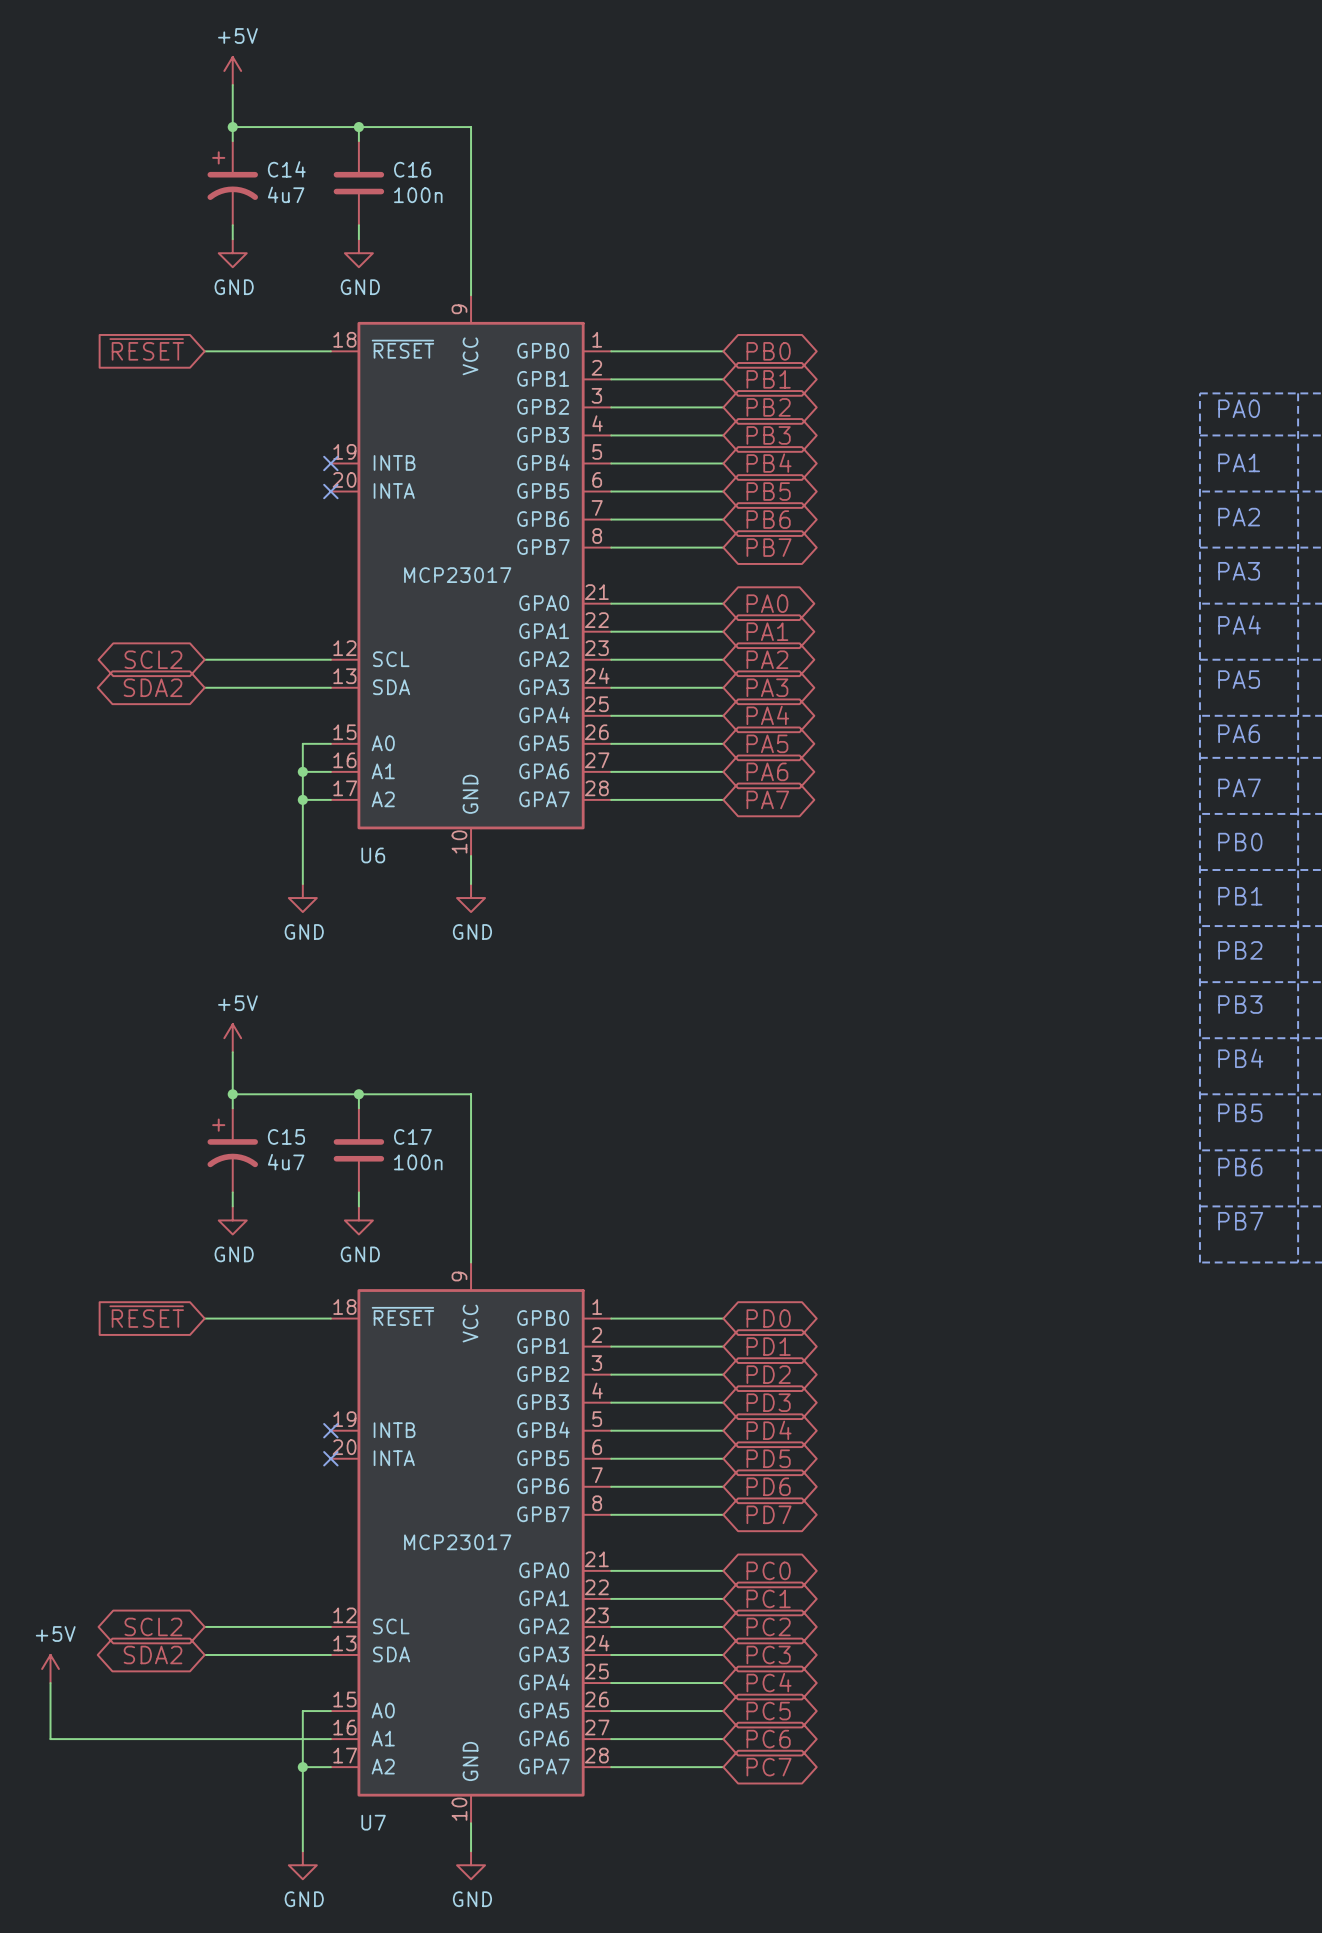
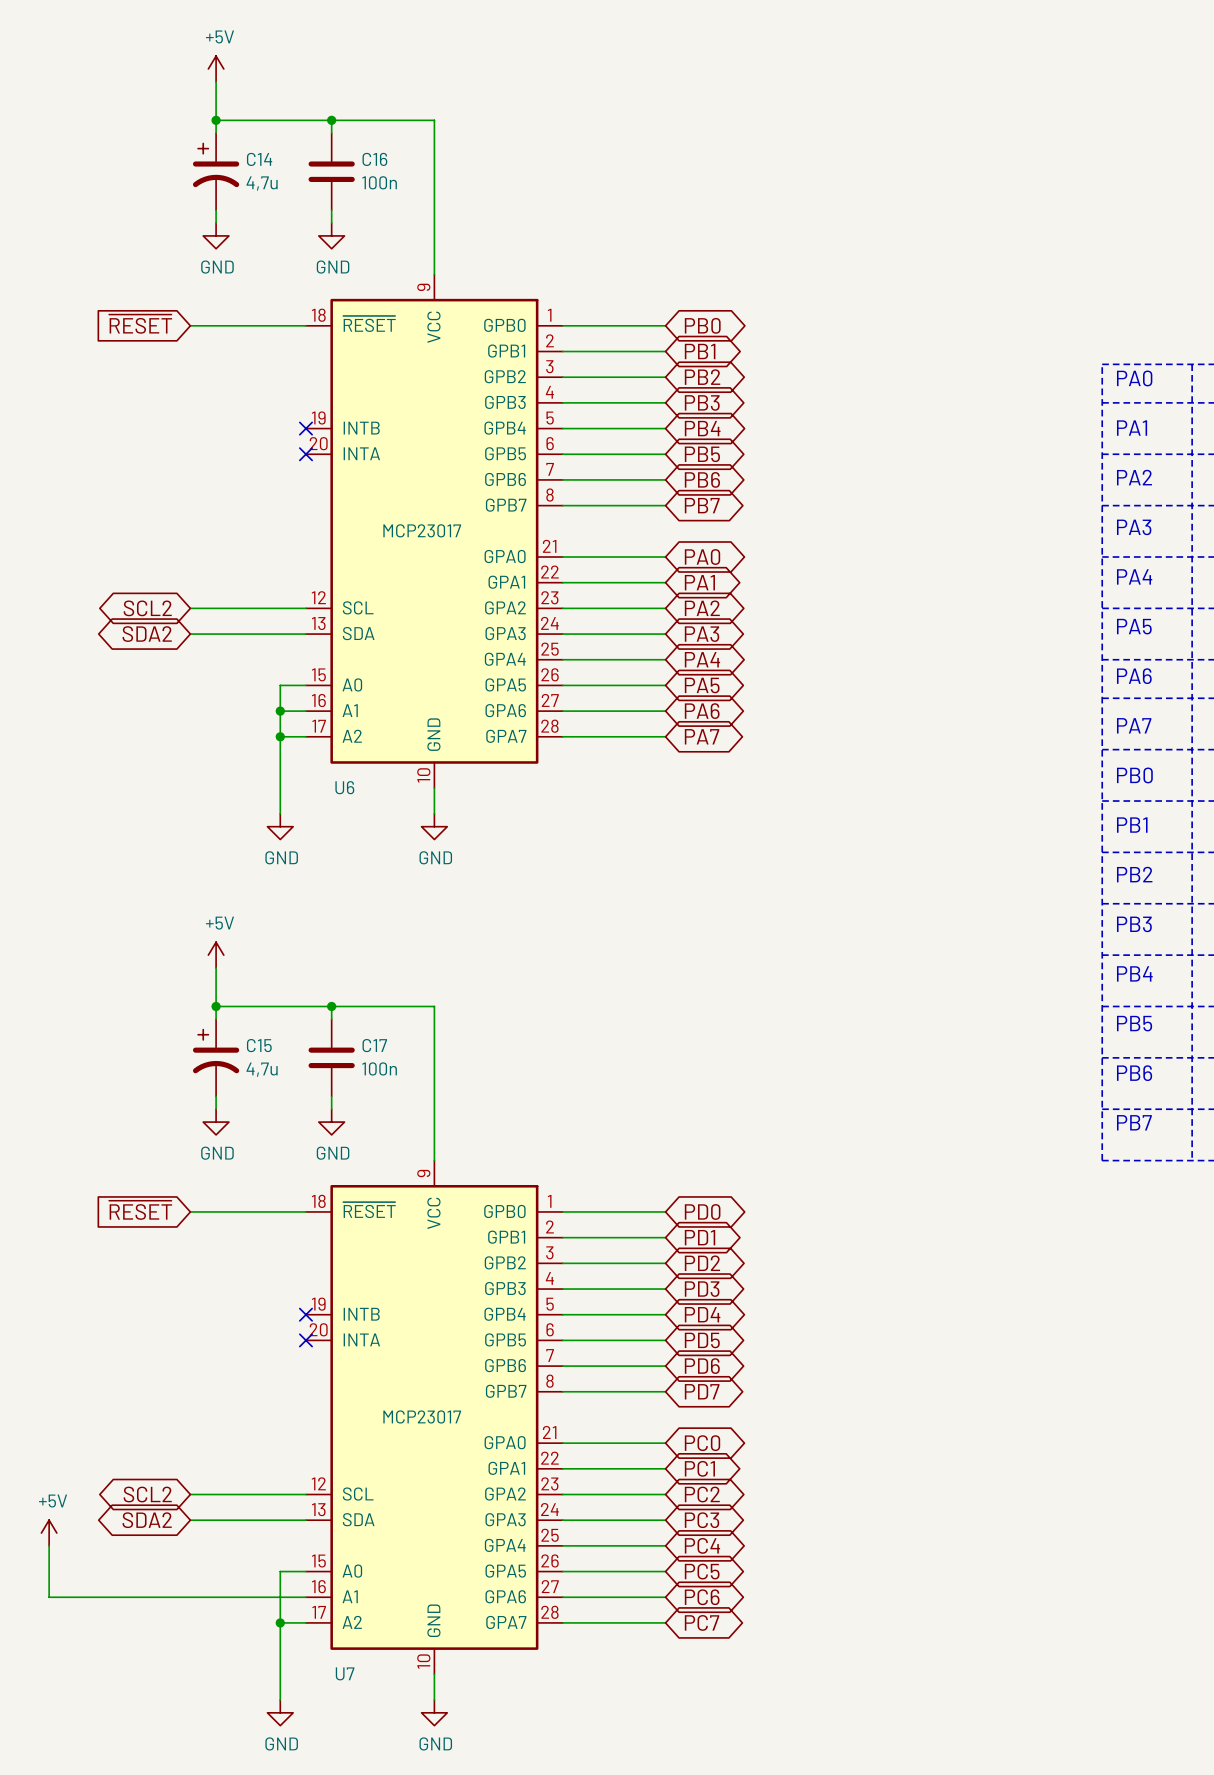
C14 value: 4u7 (286, 194) -> 4,7u (262, 183)
C15 value: 4u7 (286, 1162) -> 4,7u (262, 1069)

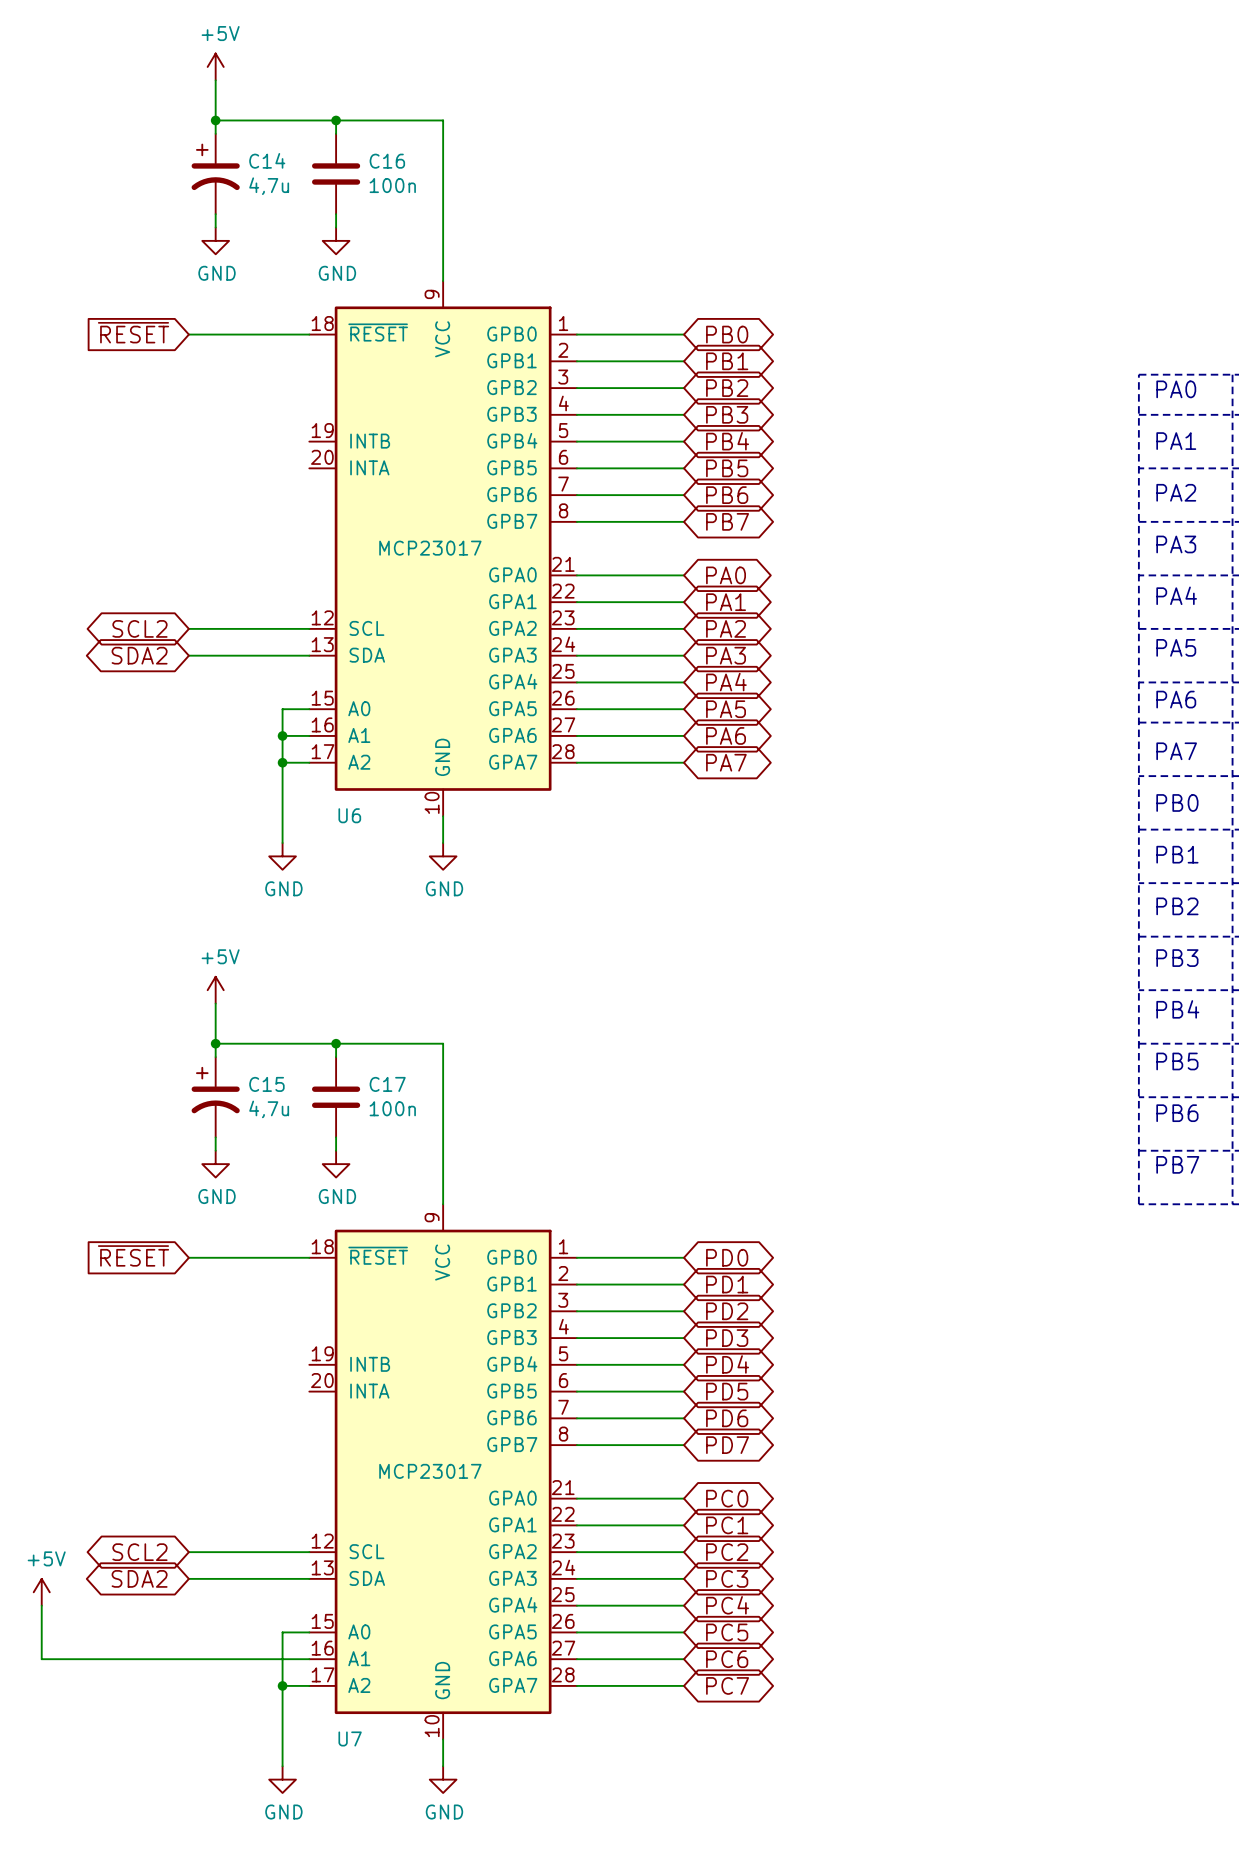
no-connect mark: (305, 428) -> none
no-connect mark: (305, 454) -> none
no-connect mark: (305, 1314) -> none
no-connect mark: (305, 1340) -> none

